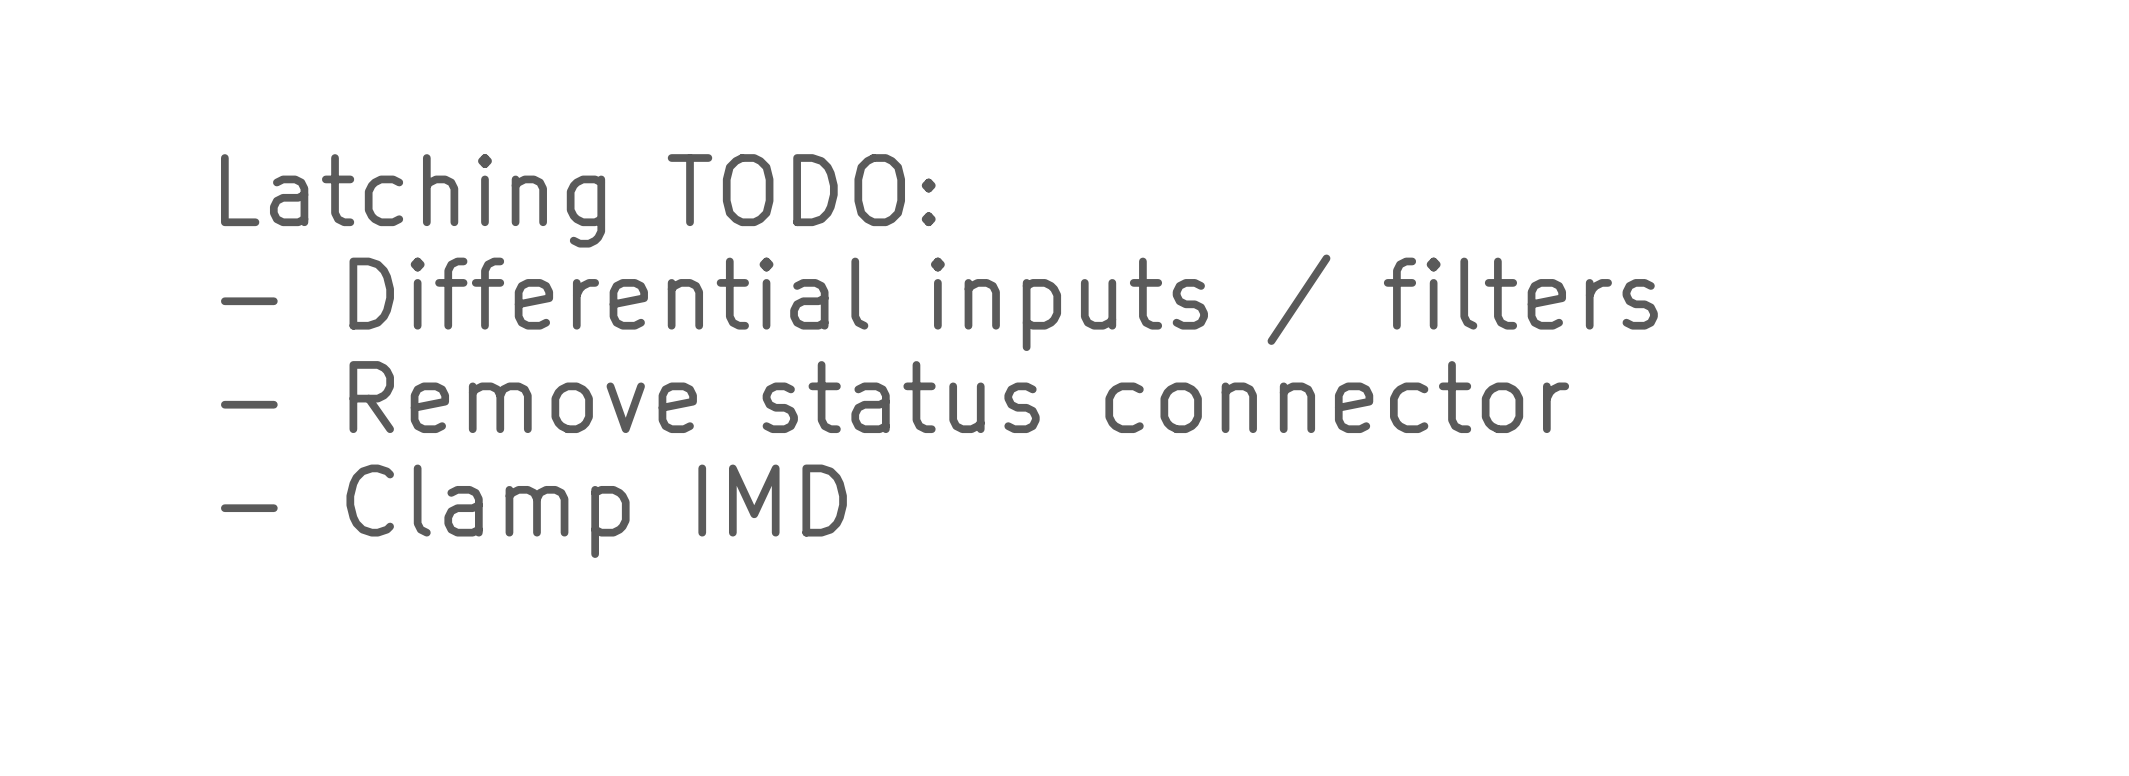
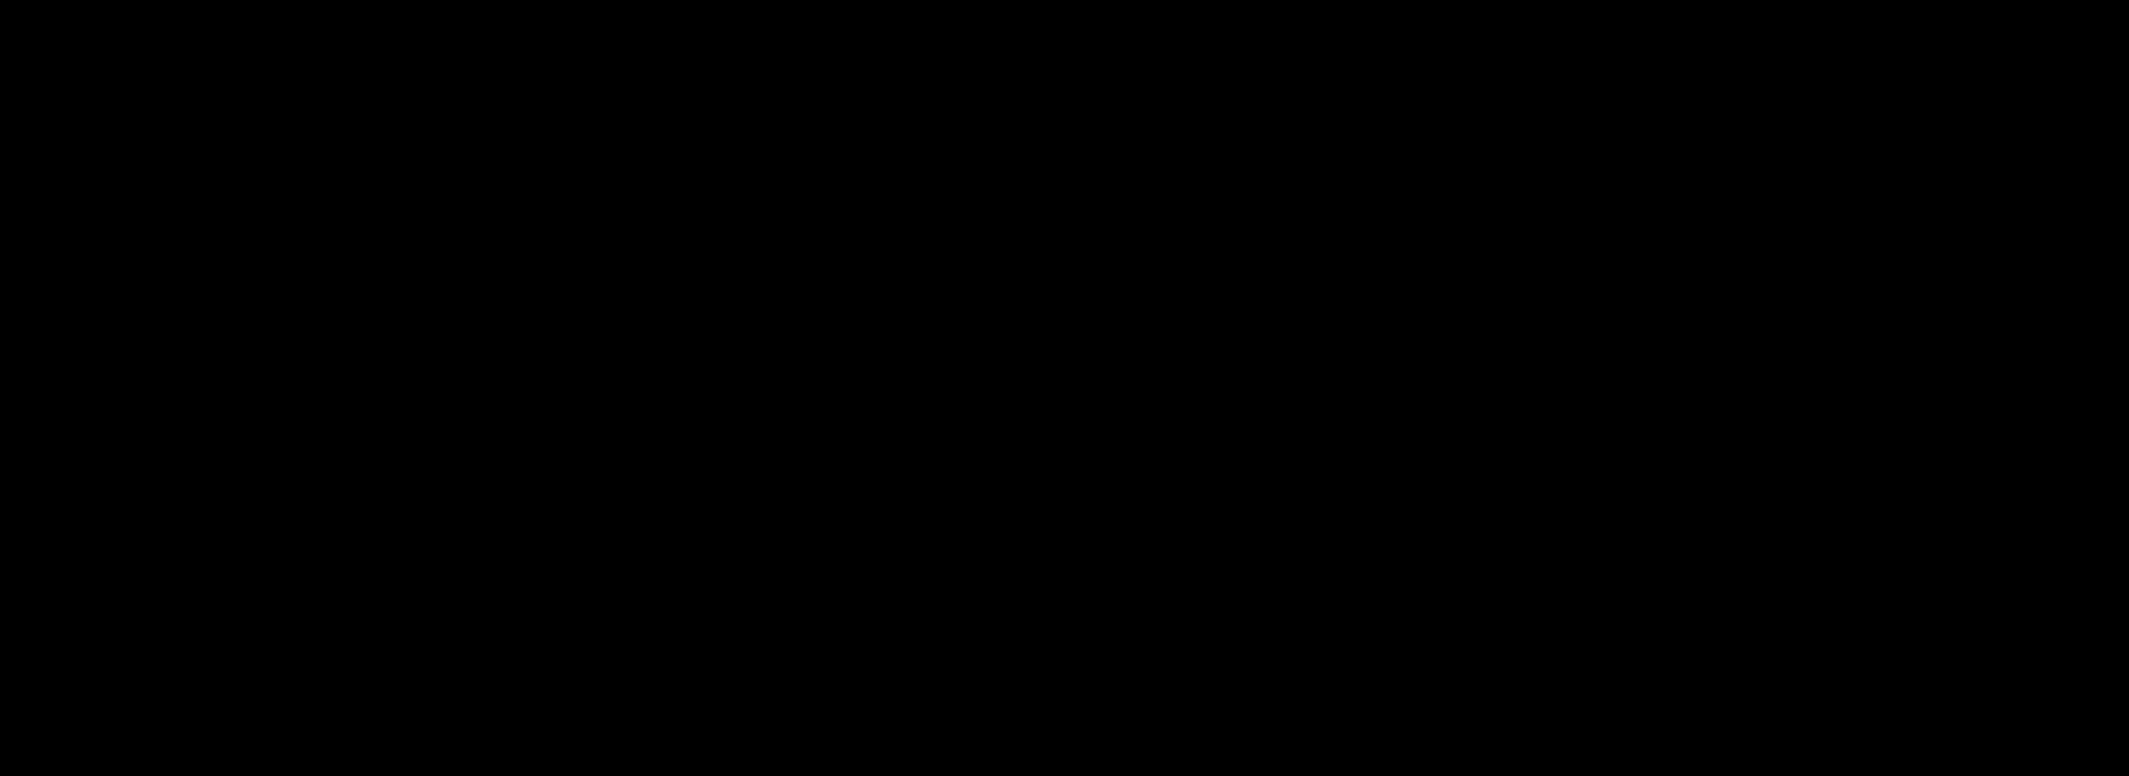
text: Latching TODO: (578, 200) -> none
text: - Differential inputs / filters (939, 302) -> none
text: - Remove status connector (895, 397) -> none
text: - Clamp IMD (533, 511) -> none

